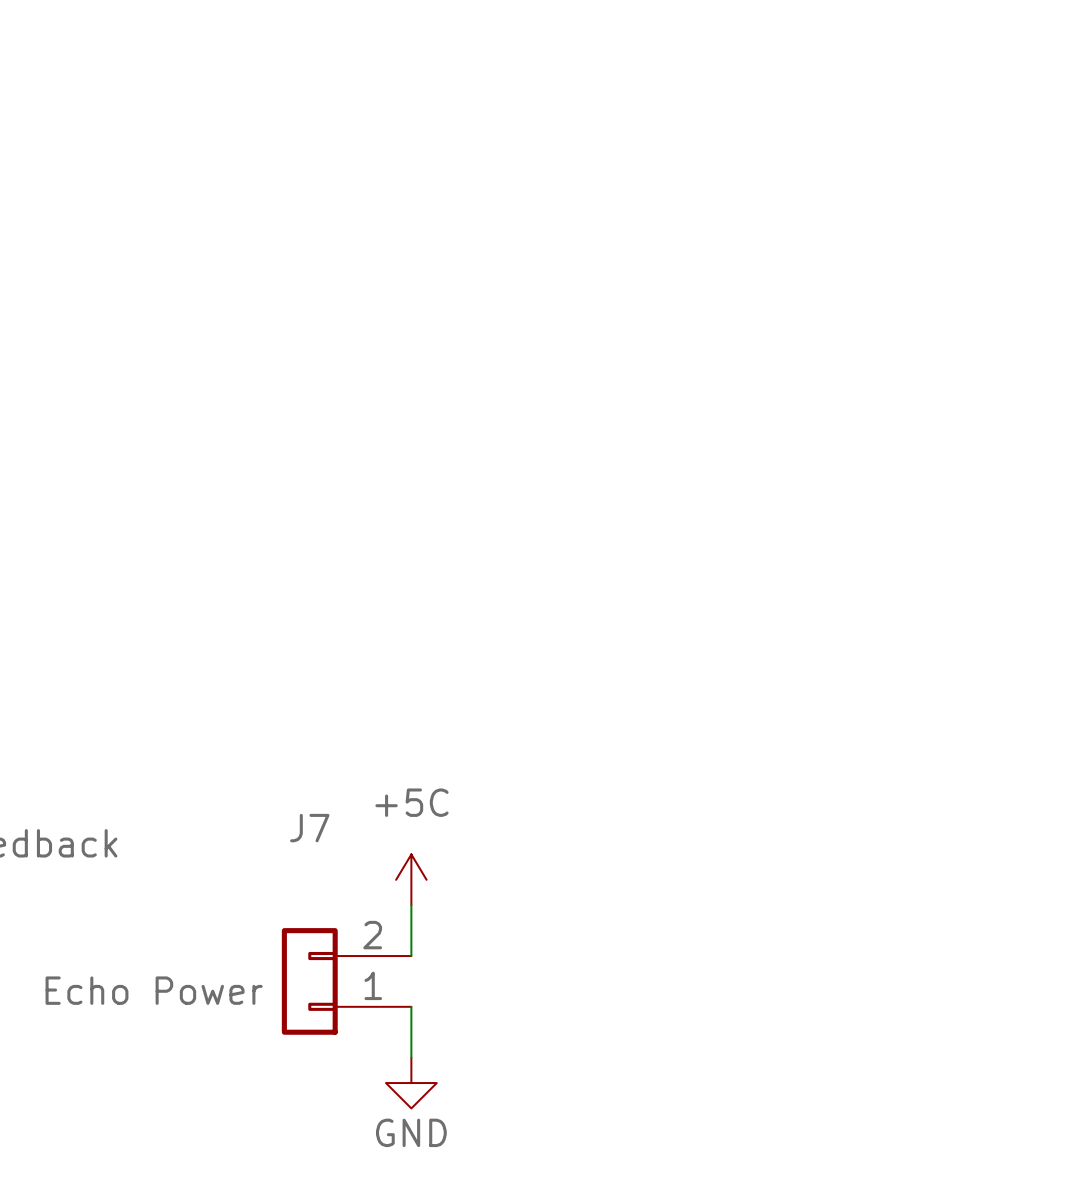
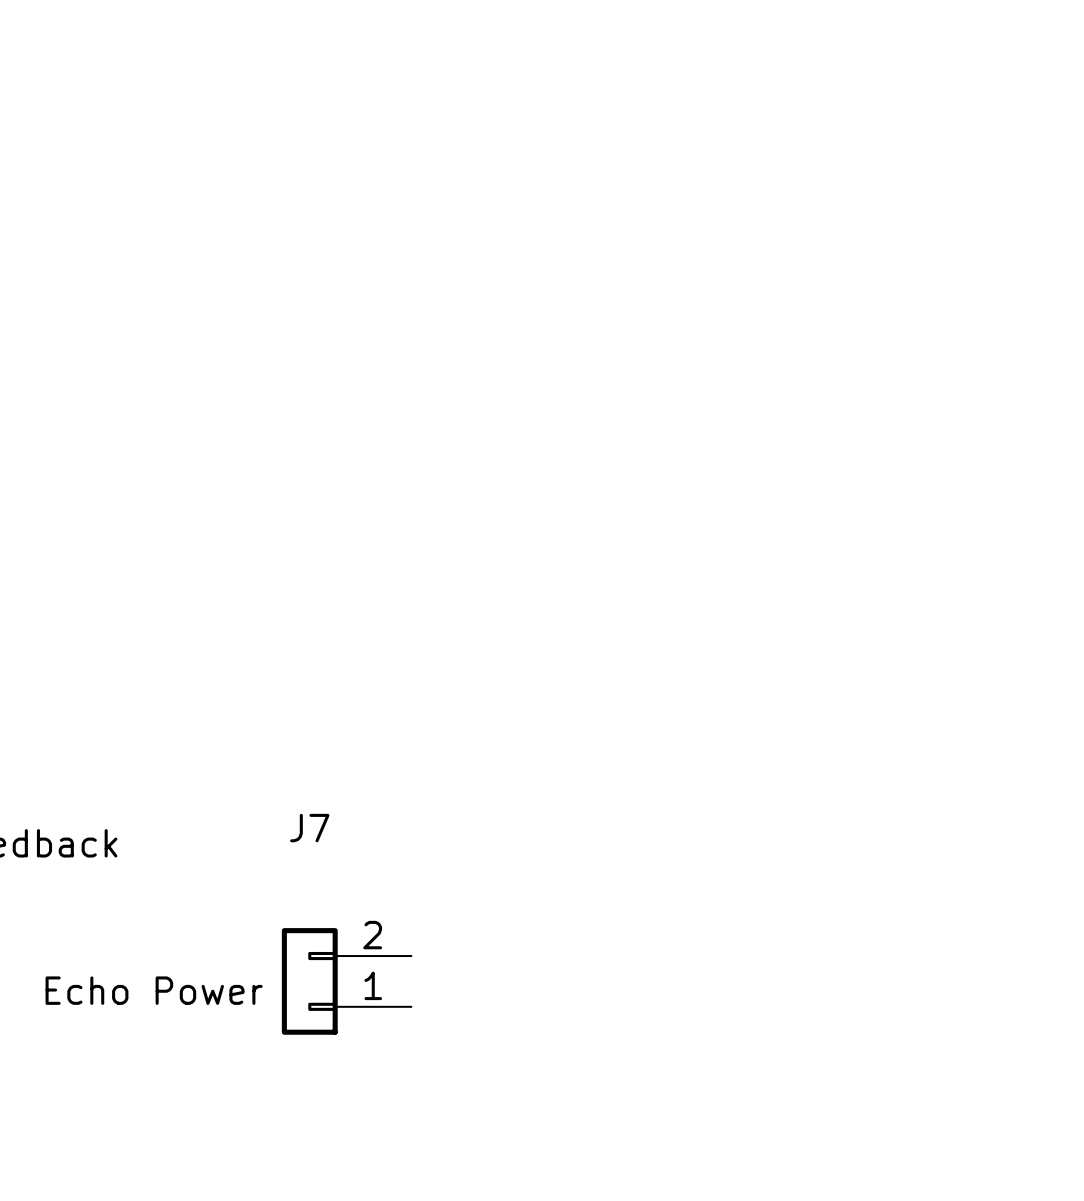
power symbol: +5C (411, 879) -> none
wire: (411, 905) (411, 956) -> none
wire: (411, 1006) (411, 1057) -> none
power symbol: GND (411, 1083) -> none

